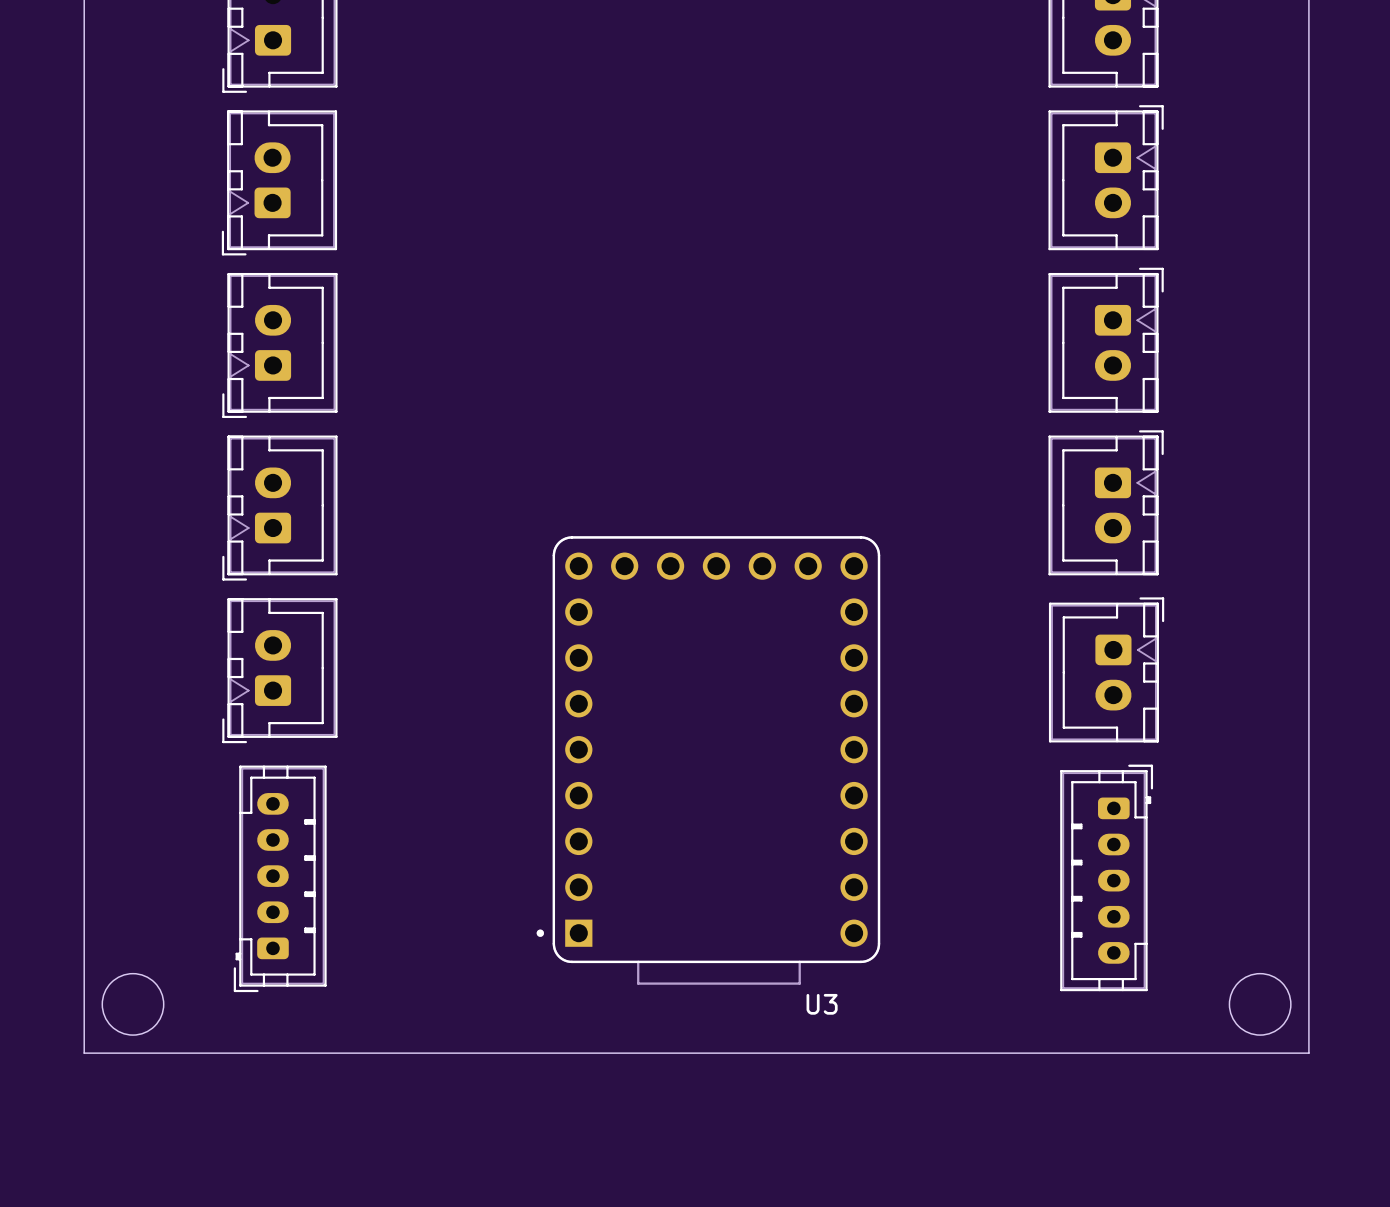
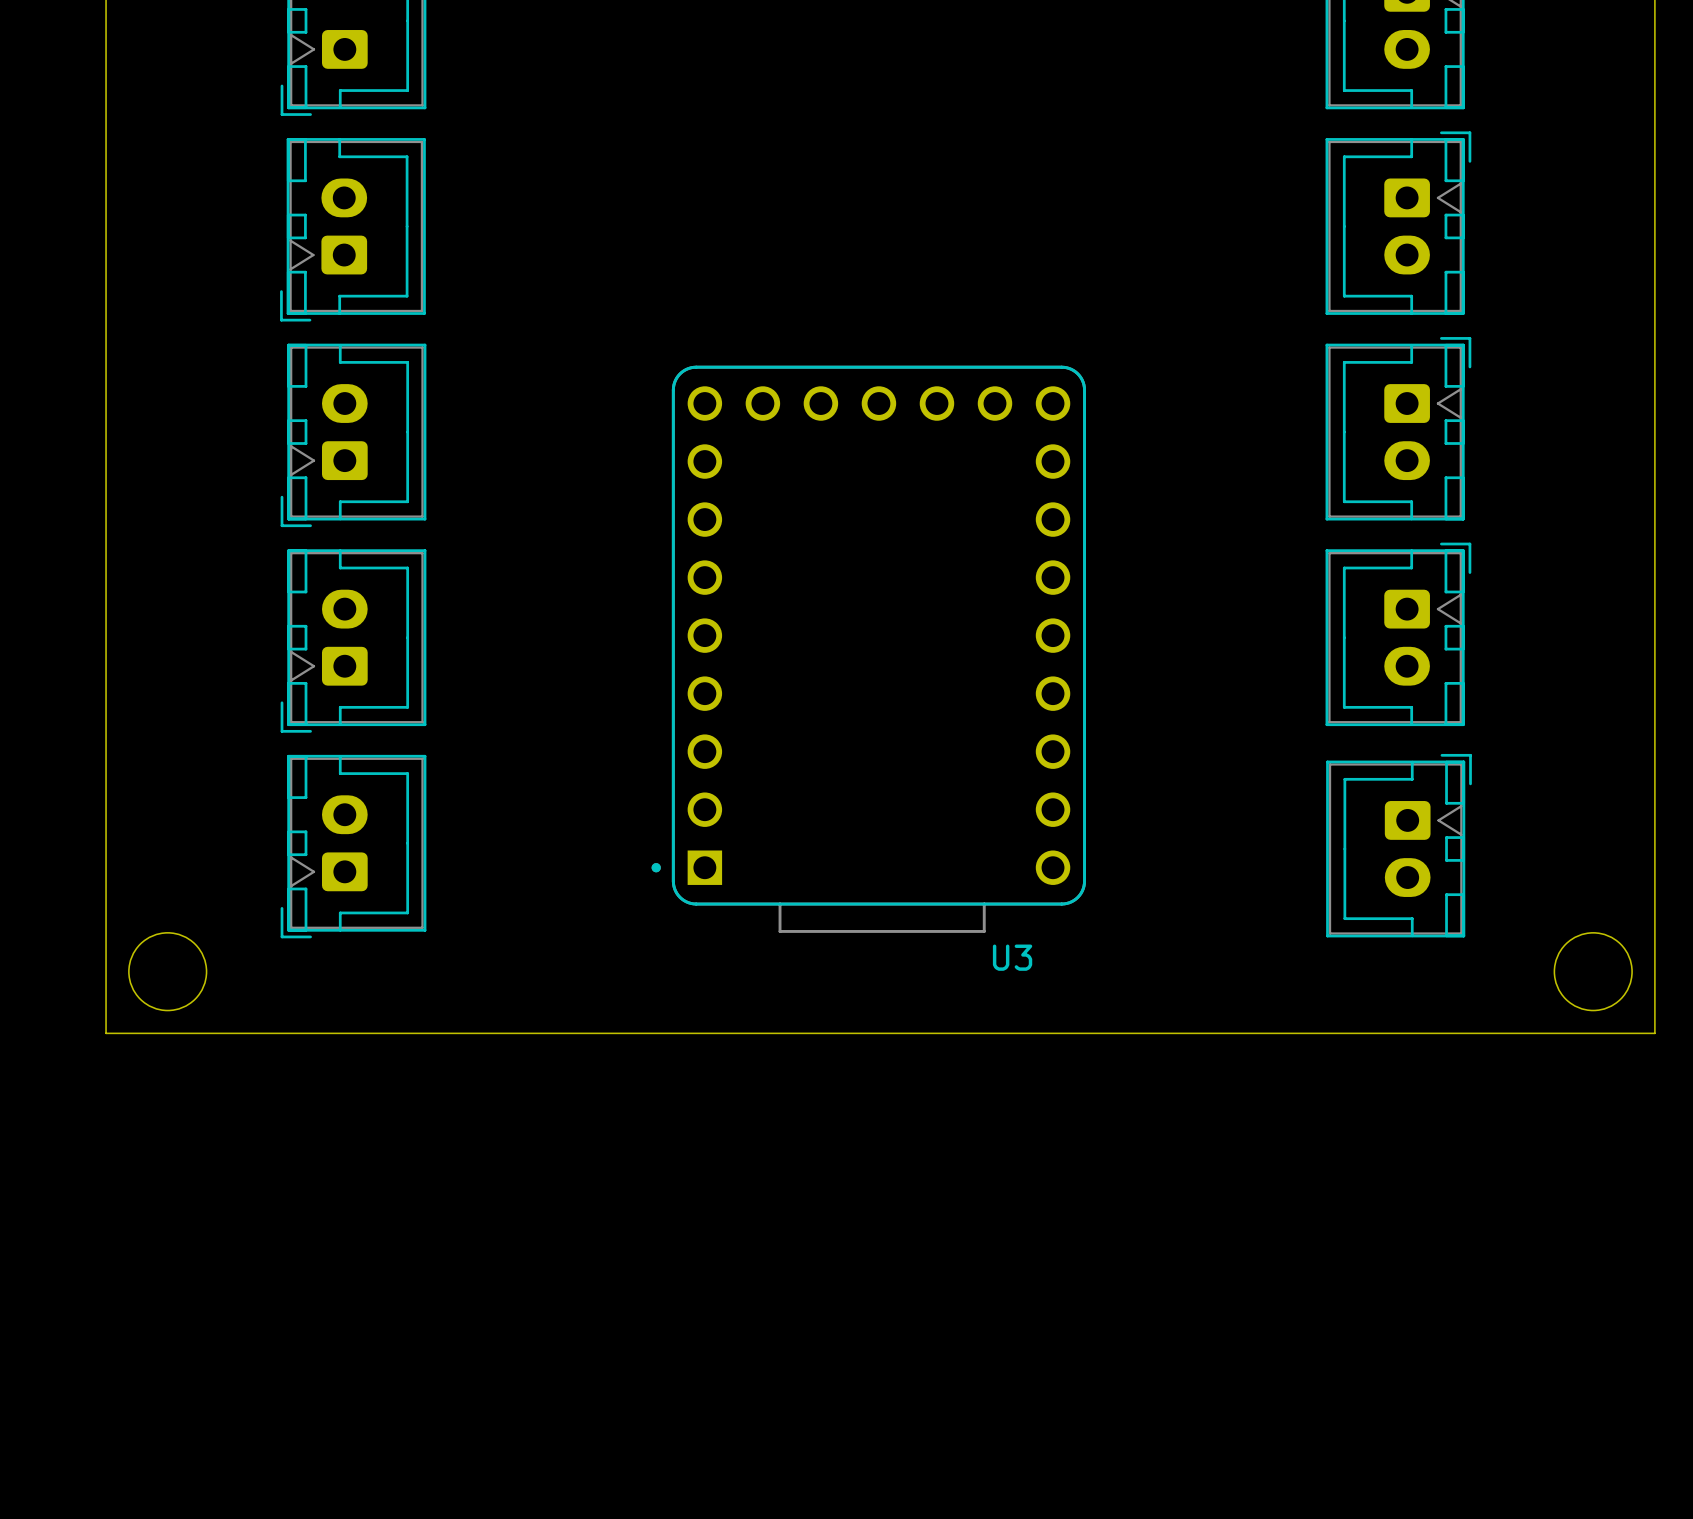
U3 position: (708, 760) -> (868, 649)
board edge: (84, 818) (84, 1053) (1308, 1053) (1308, 818) -> (106, 1033) (1654, 1033)
part: (1106, 877) -> none
part: (280, 878) -> none
round board edge position: (132, 1004) -> (167, 971)
round board edge position: (1260, 1004) -> (1593, 971)

